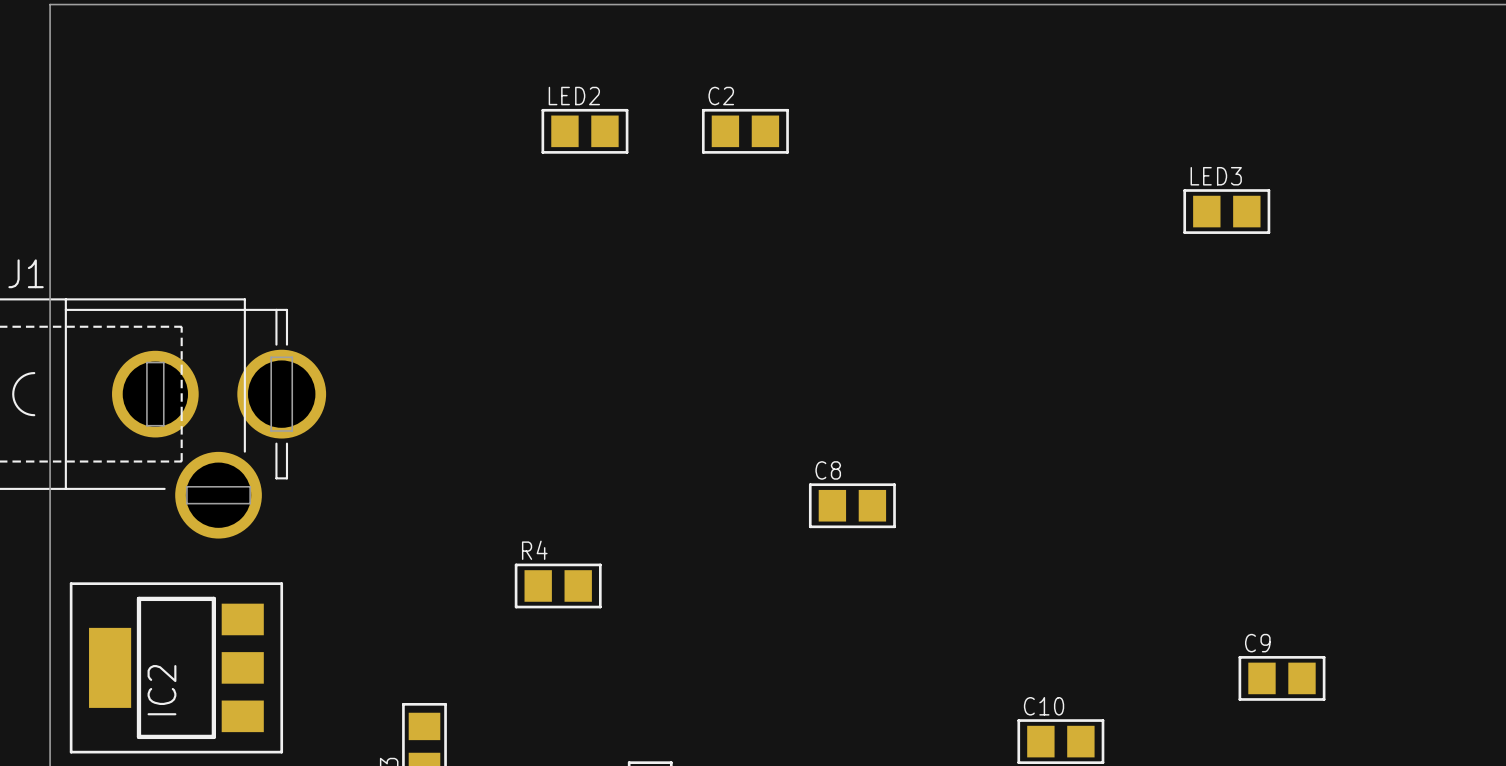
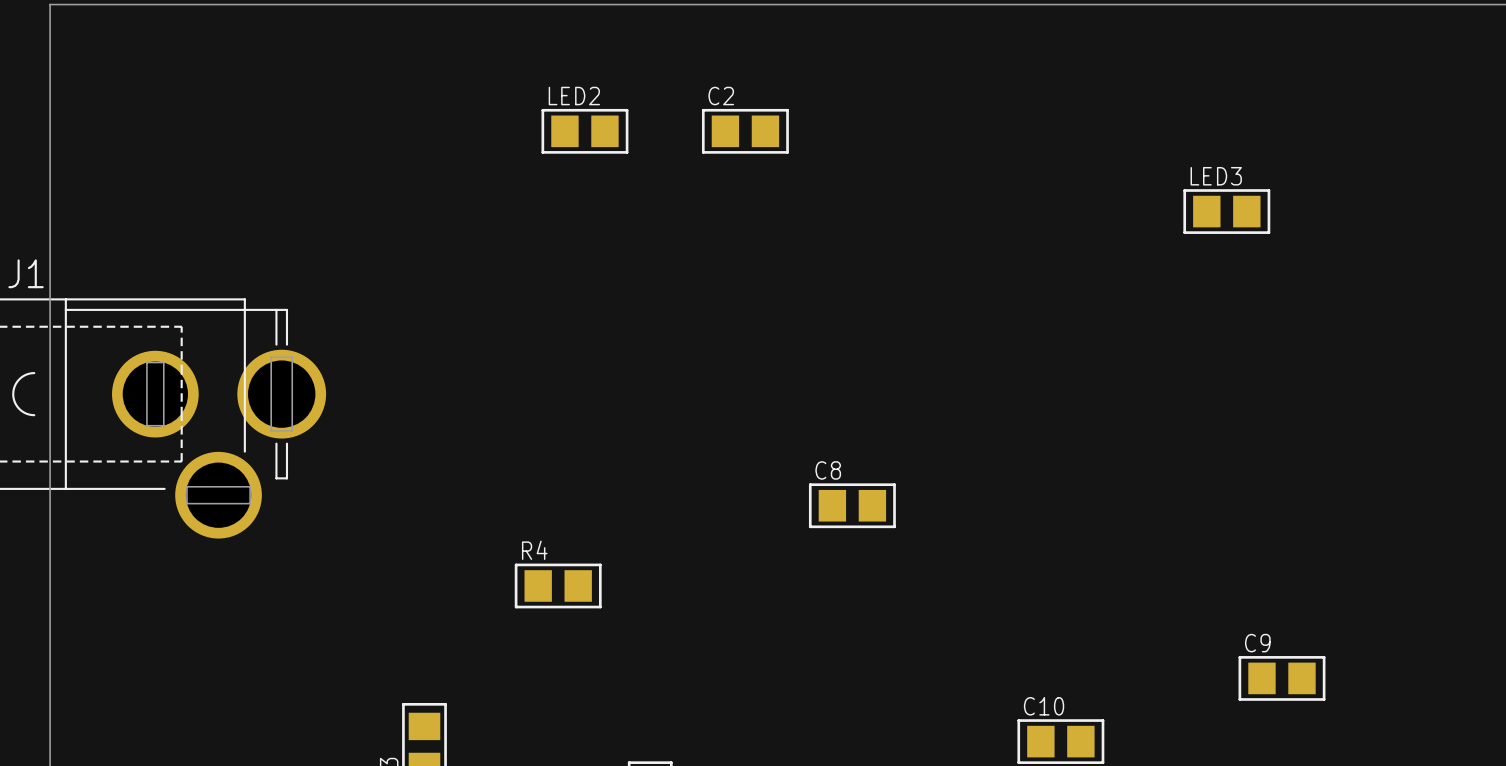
IC2: (176, 667) -> none

